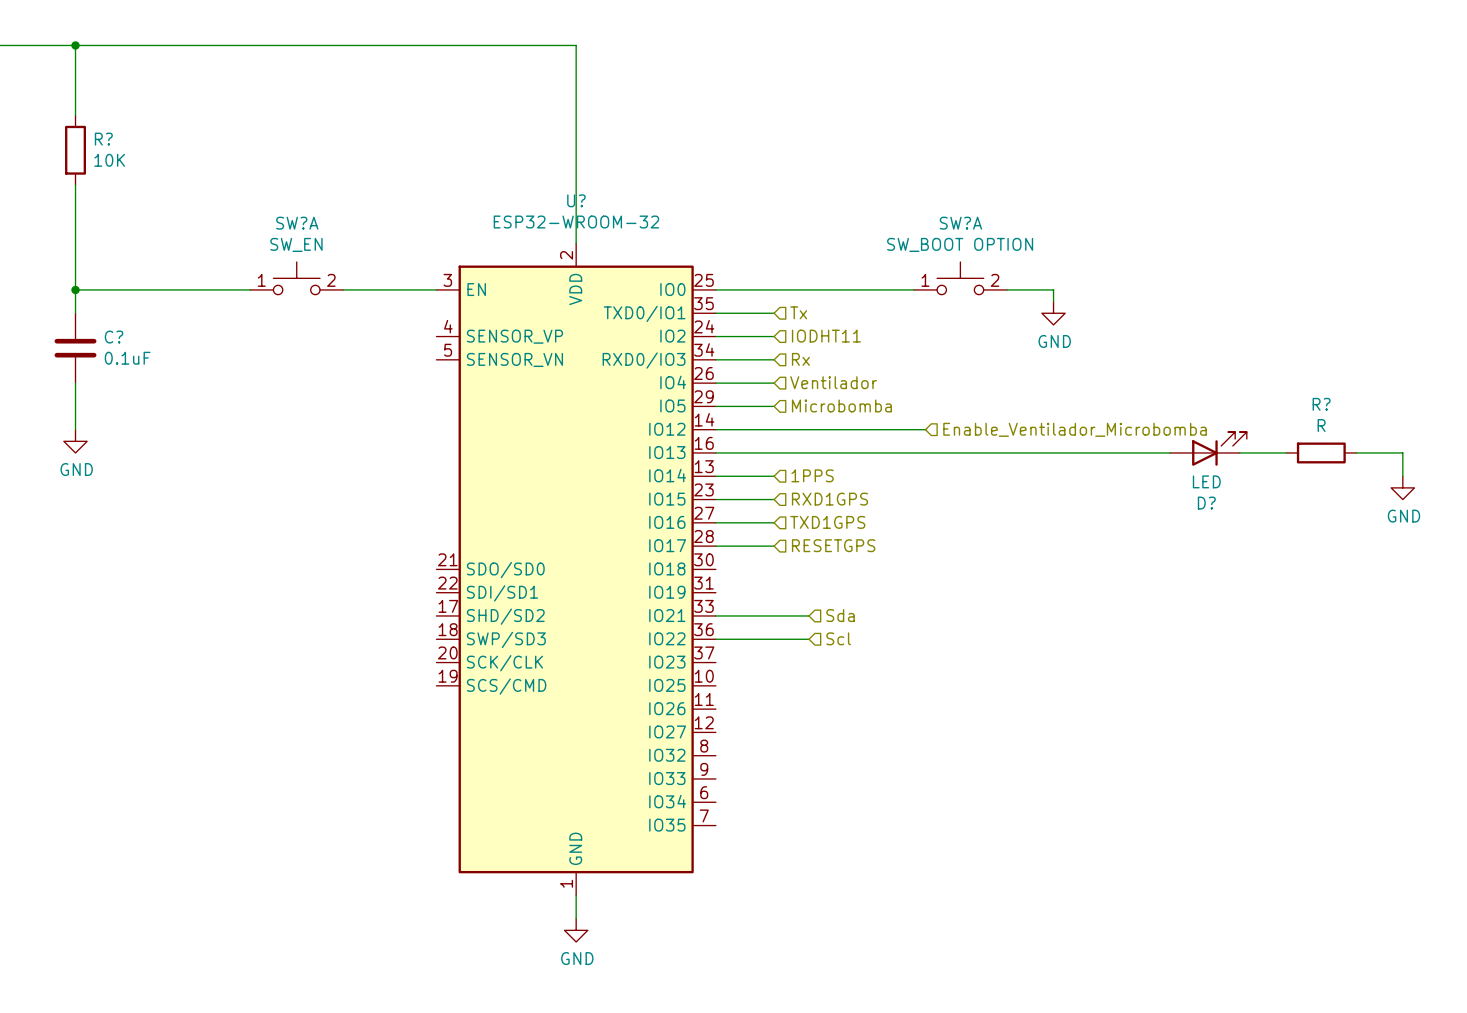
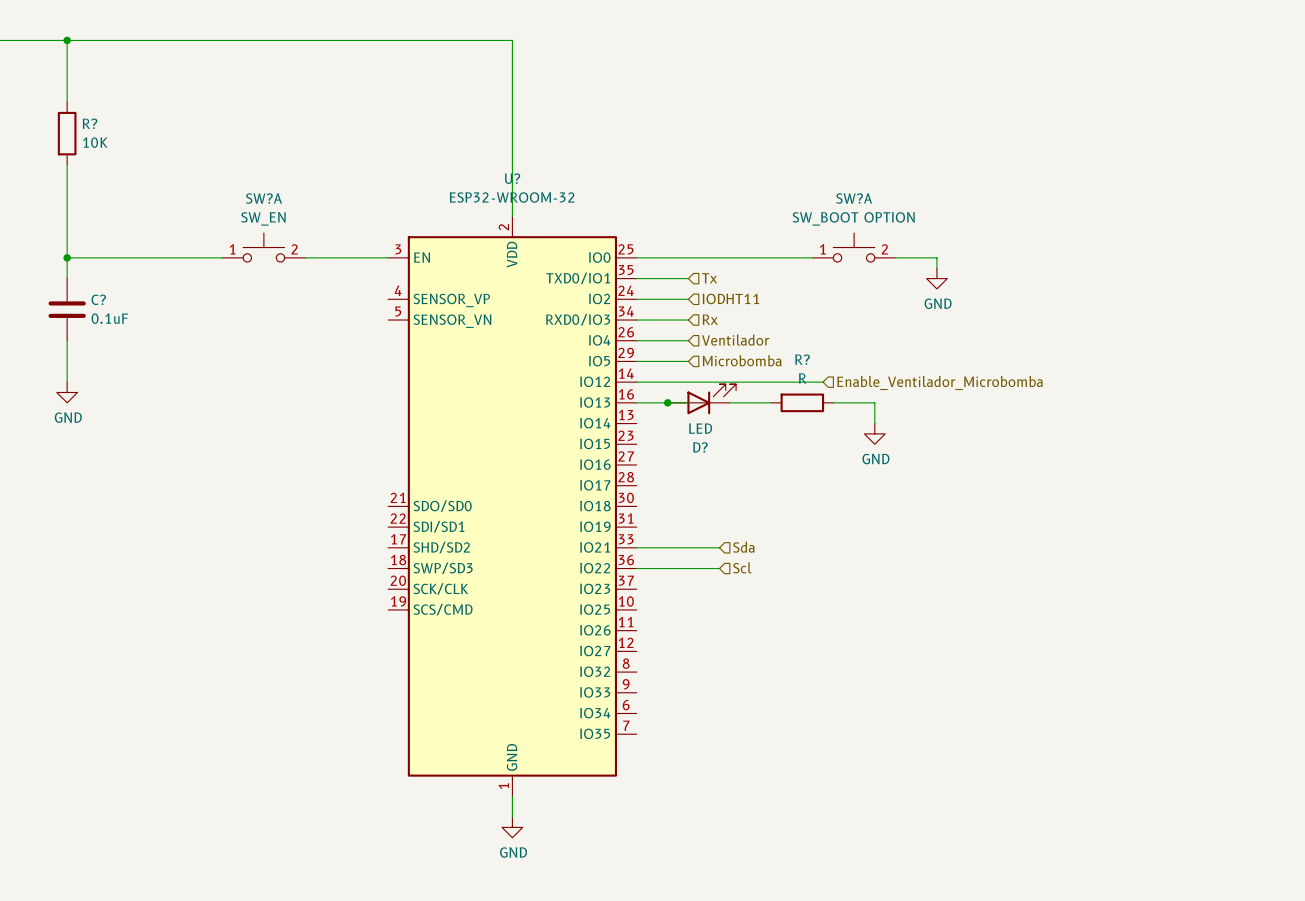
D?: none -> LED (701, 399)
D?: LED (1208, 448) -> none
junction: none -> (667, 402)
wire: (867, 452) (937, 452) -> none
R?: none -> R (802, 402)
wire: (983, 452) (1169, 452) -> (874, 402) (874, 423)
wire: (1239, 452) (1286, 452) -> none
R?: R (1321, 452) -> none
wire: (1356, 452) (1402, 452) (1402, 476) -> none
hierarchical label: 1PPS (812, 475) -> none
wire: (715, 476) (774, 476) -> none
power symbol: none -> GND (874, 433)
power symbol: GND (1402, 487) -> none
wire: (715, 499) (774, 499) -> none
hierarchical label: RXD1GPS (830, 499) -> none
wire: (715, 522) (774, 522) -> none
hierarchical label: TXD1GPS (827, 522) -> none
hierarchical label: RESETGPS (833, 545) -> none
wire: (715, 546) (774, 546) -> none

